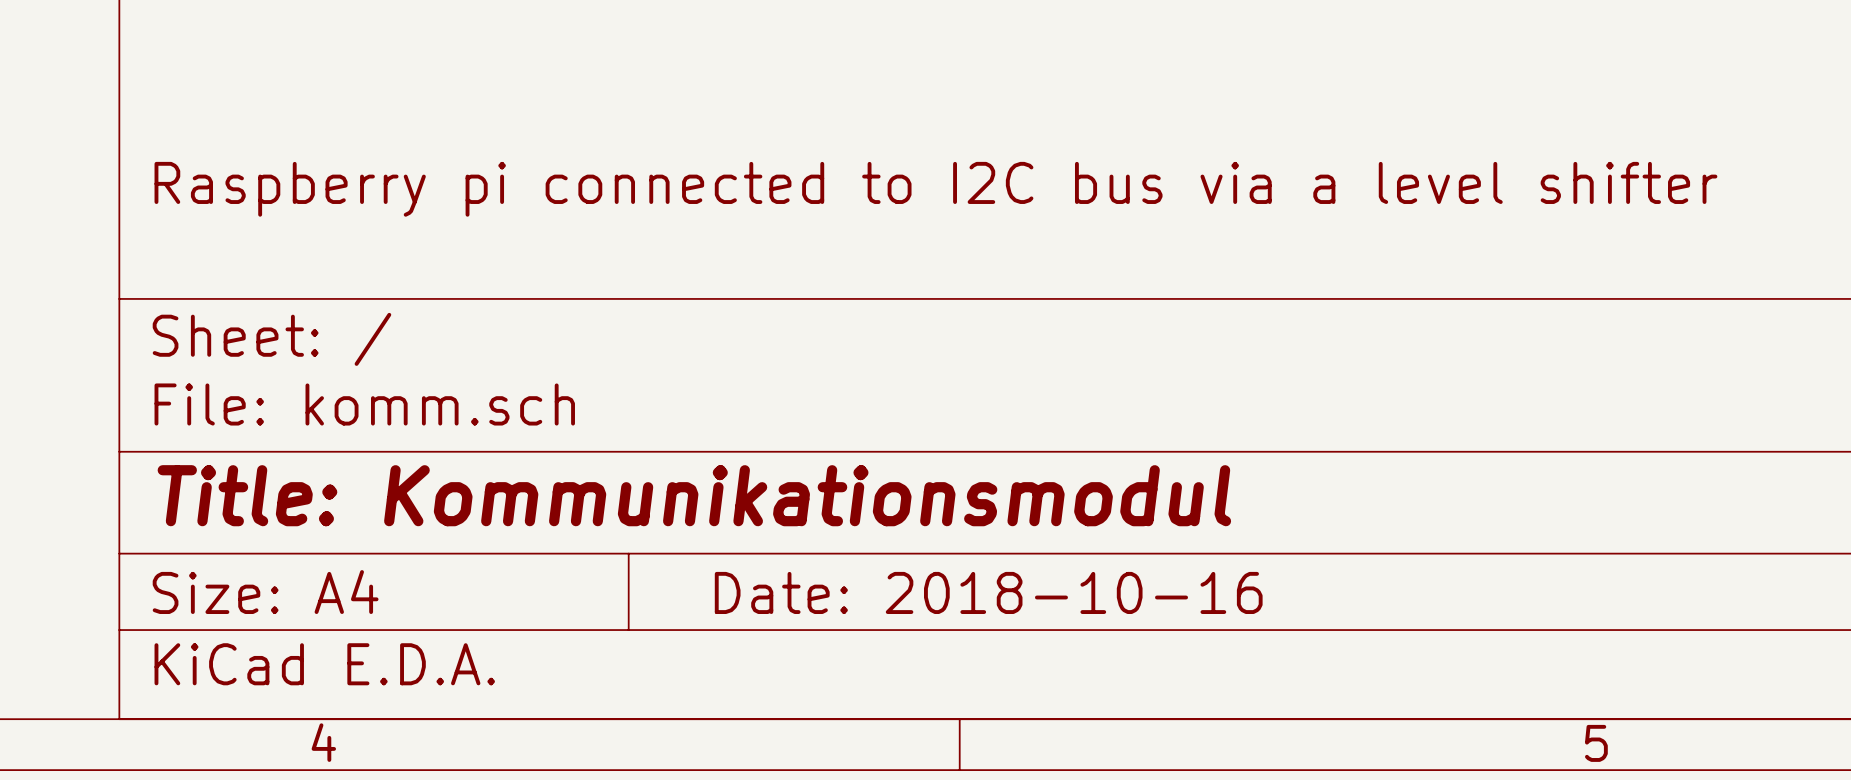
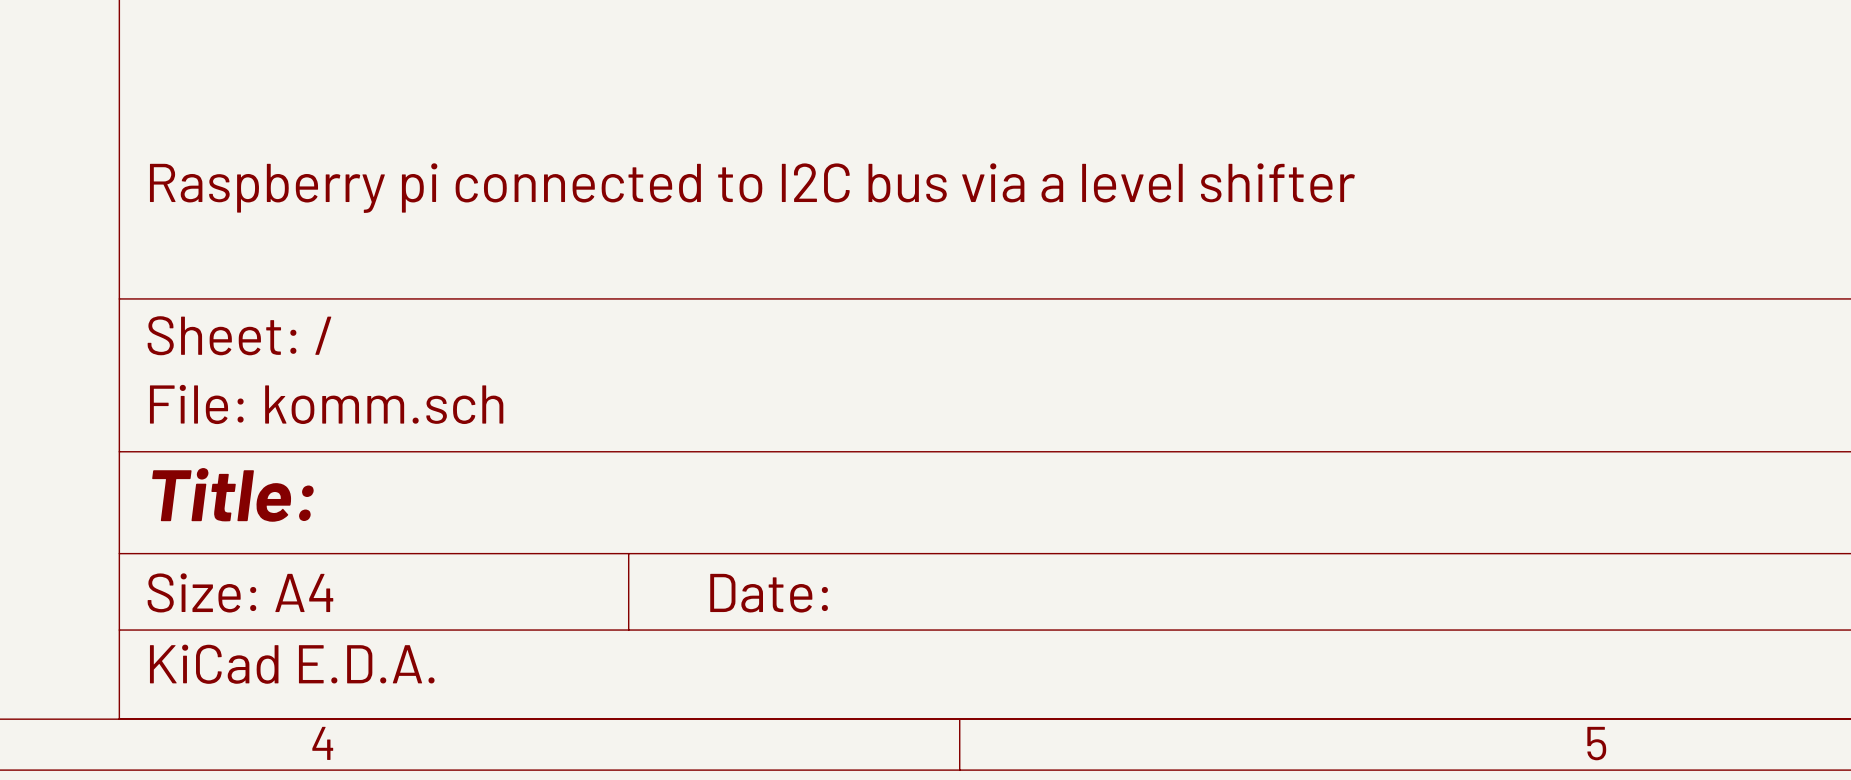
title block: Title: Kommunikationsmodul (694, 495) -> Title: (233, 494)
title block: Date: 2018-10-16 (988, 592) -> Date: (769, 593)

